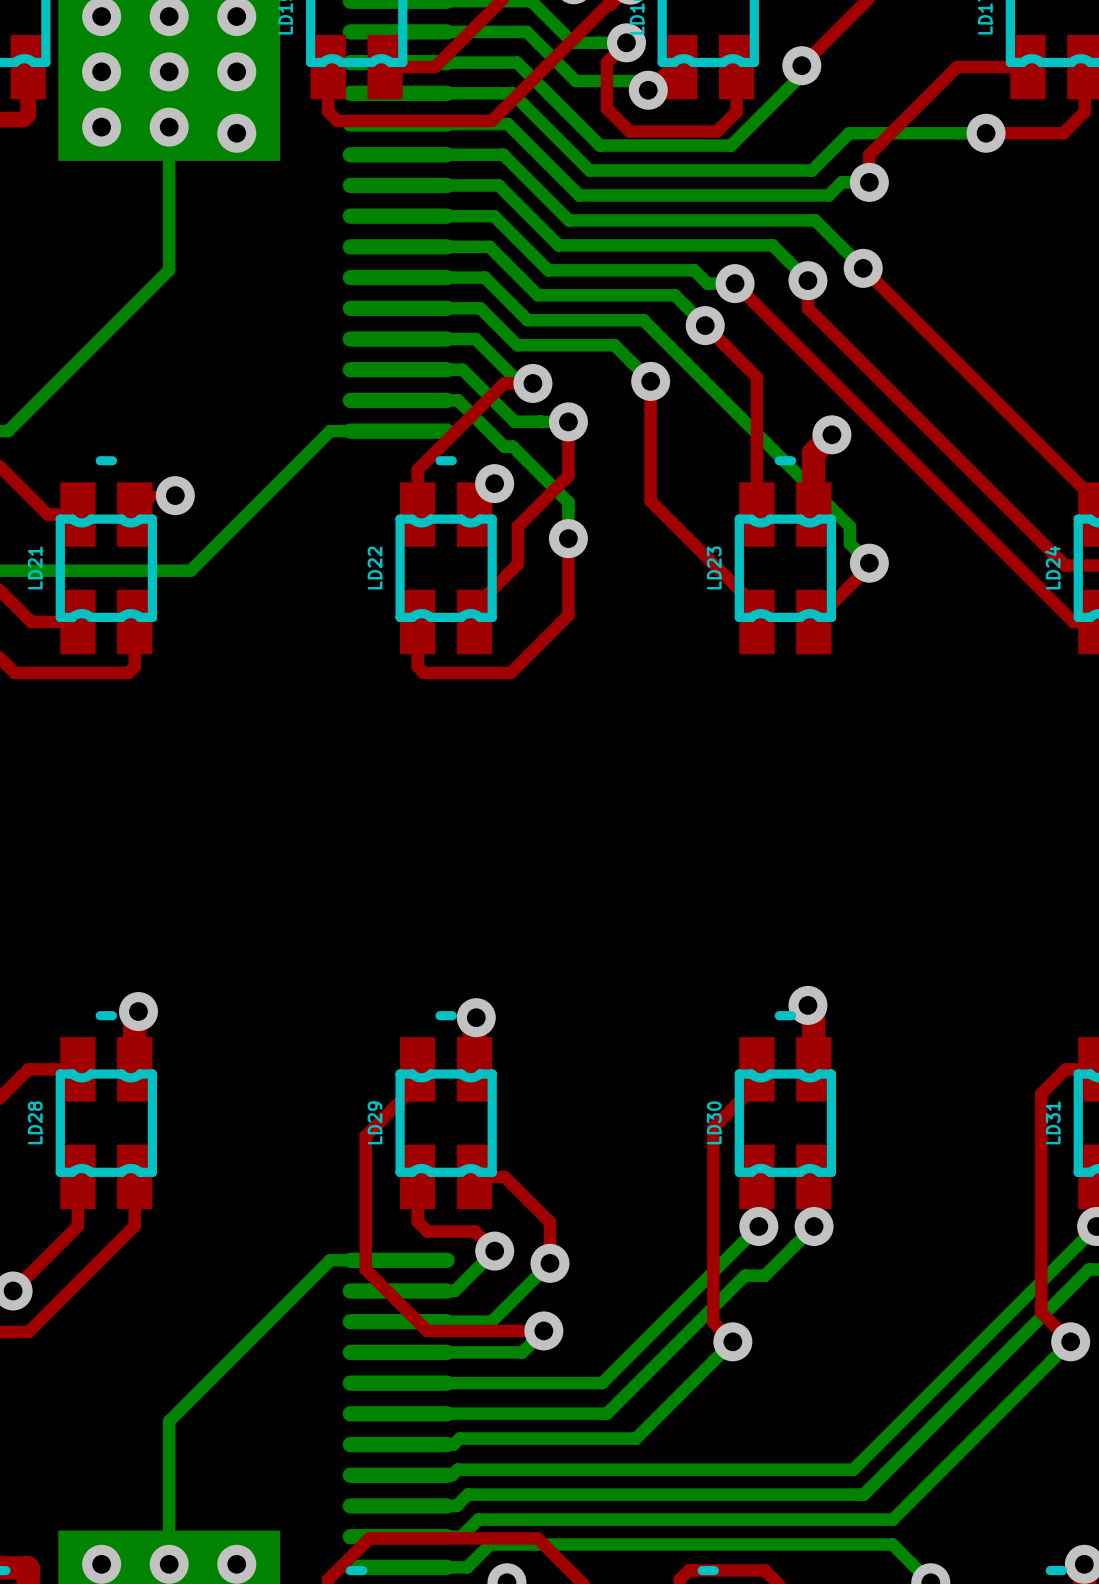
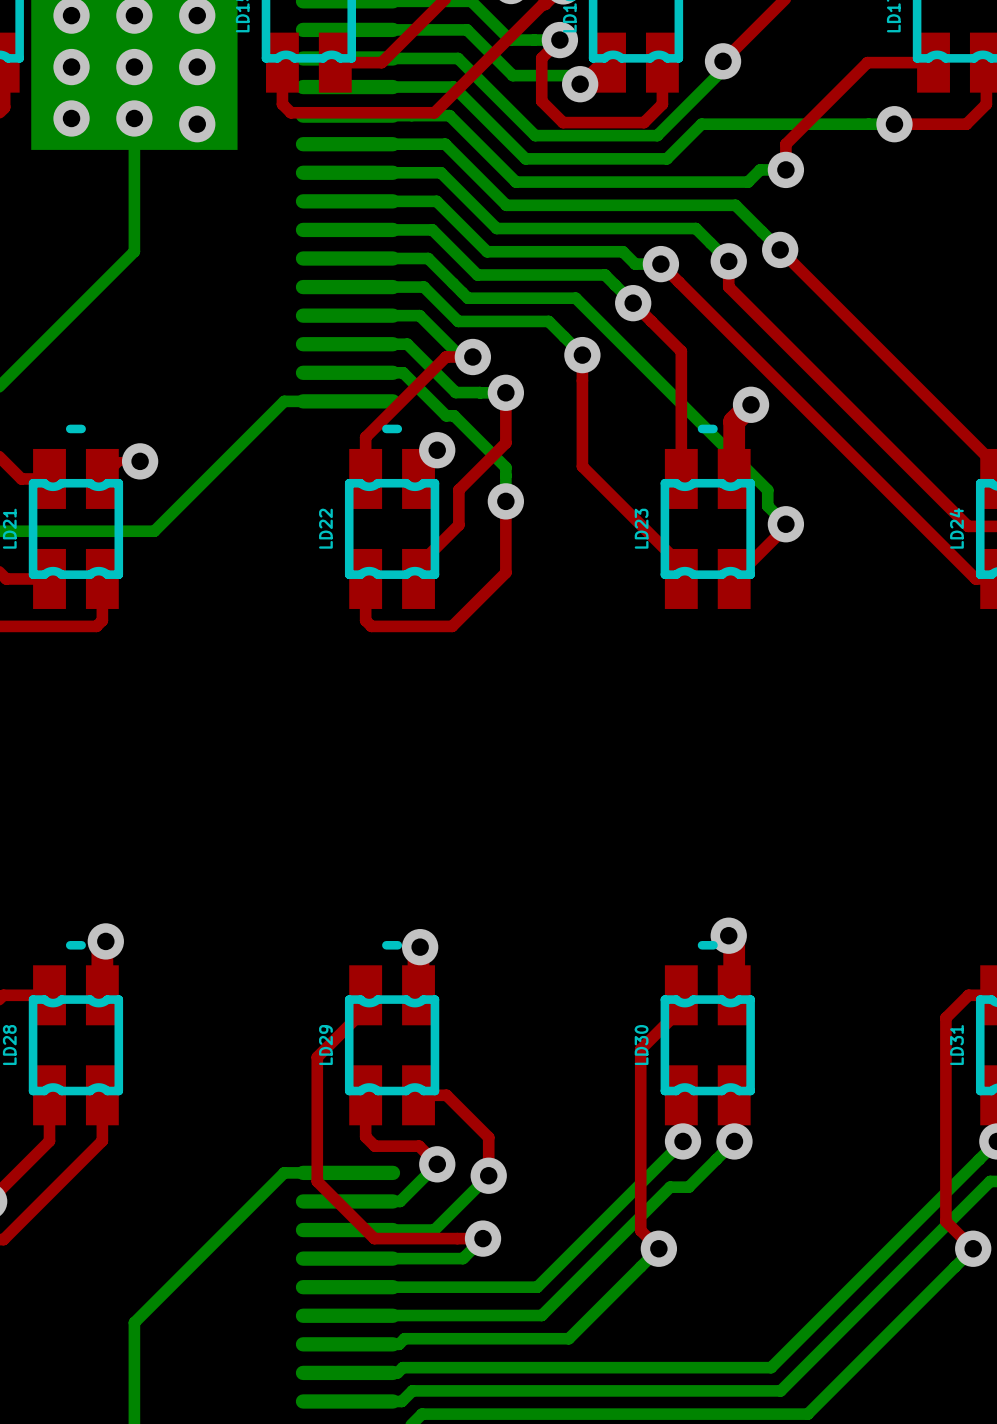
bottom track: (849, 133) (812, 170) (741, 170) -> (767, 124) (701, 124) (666, 158)

